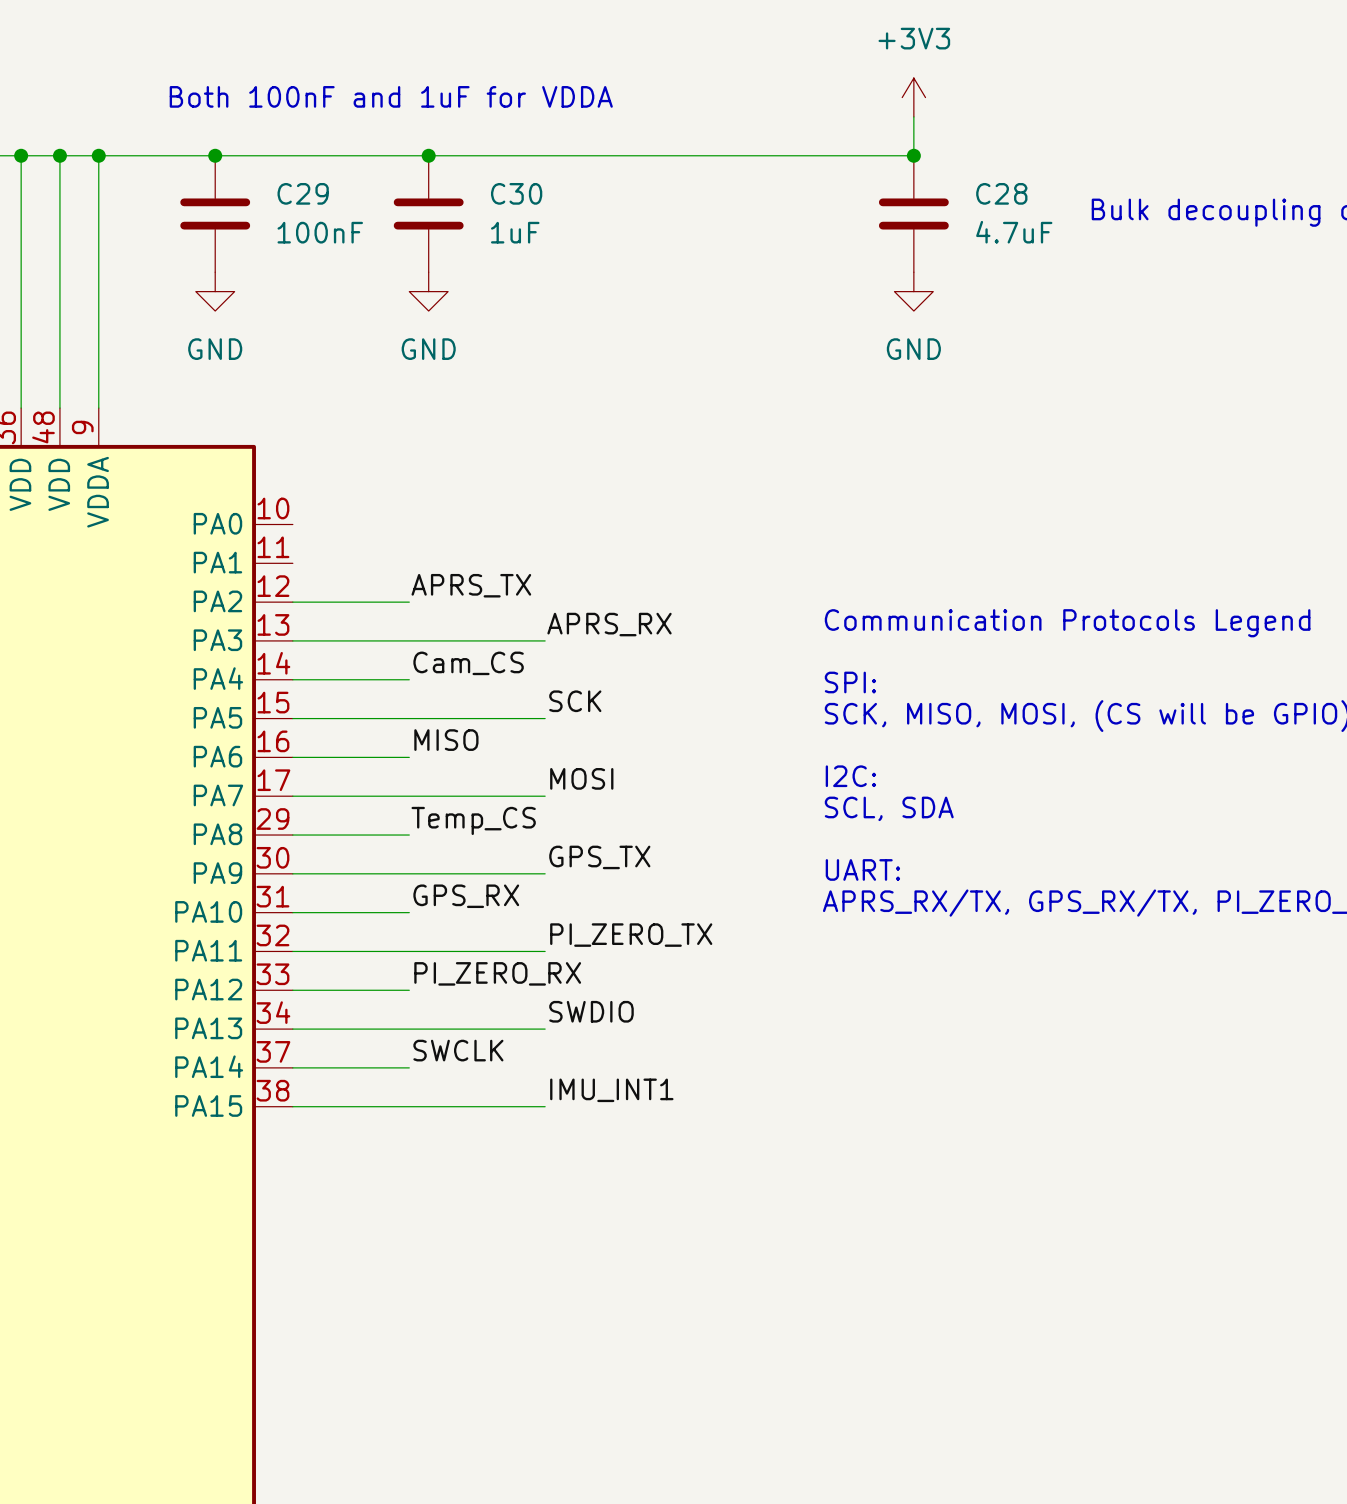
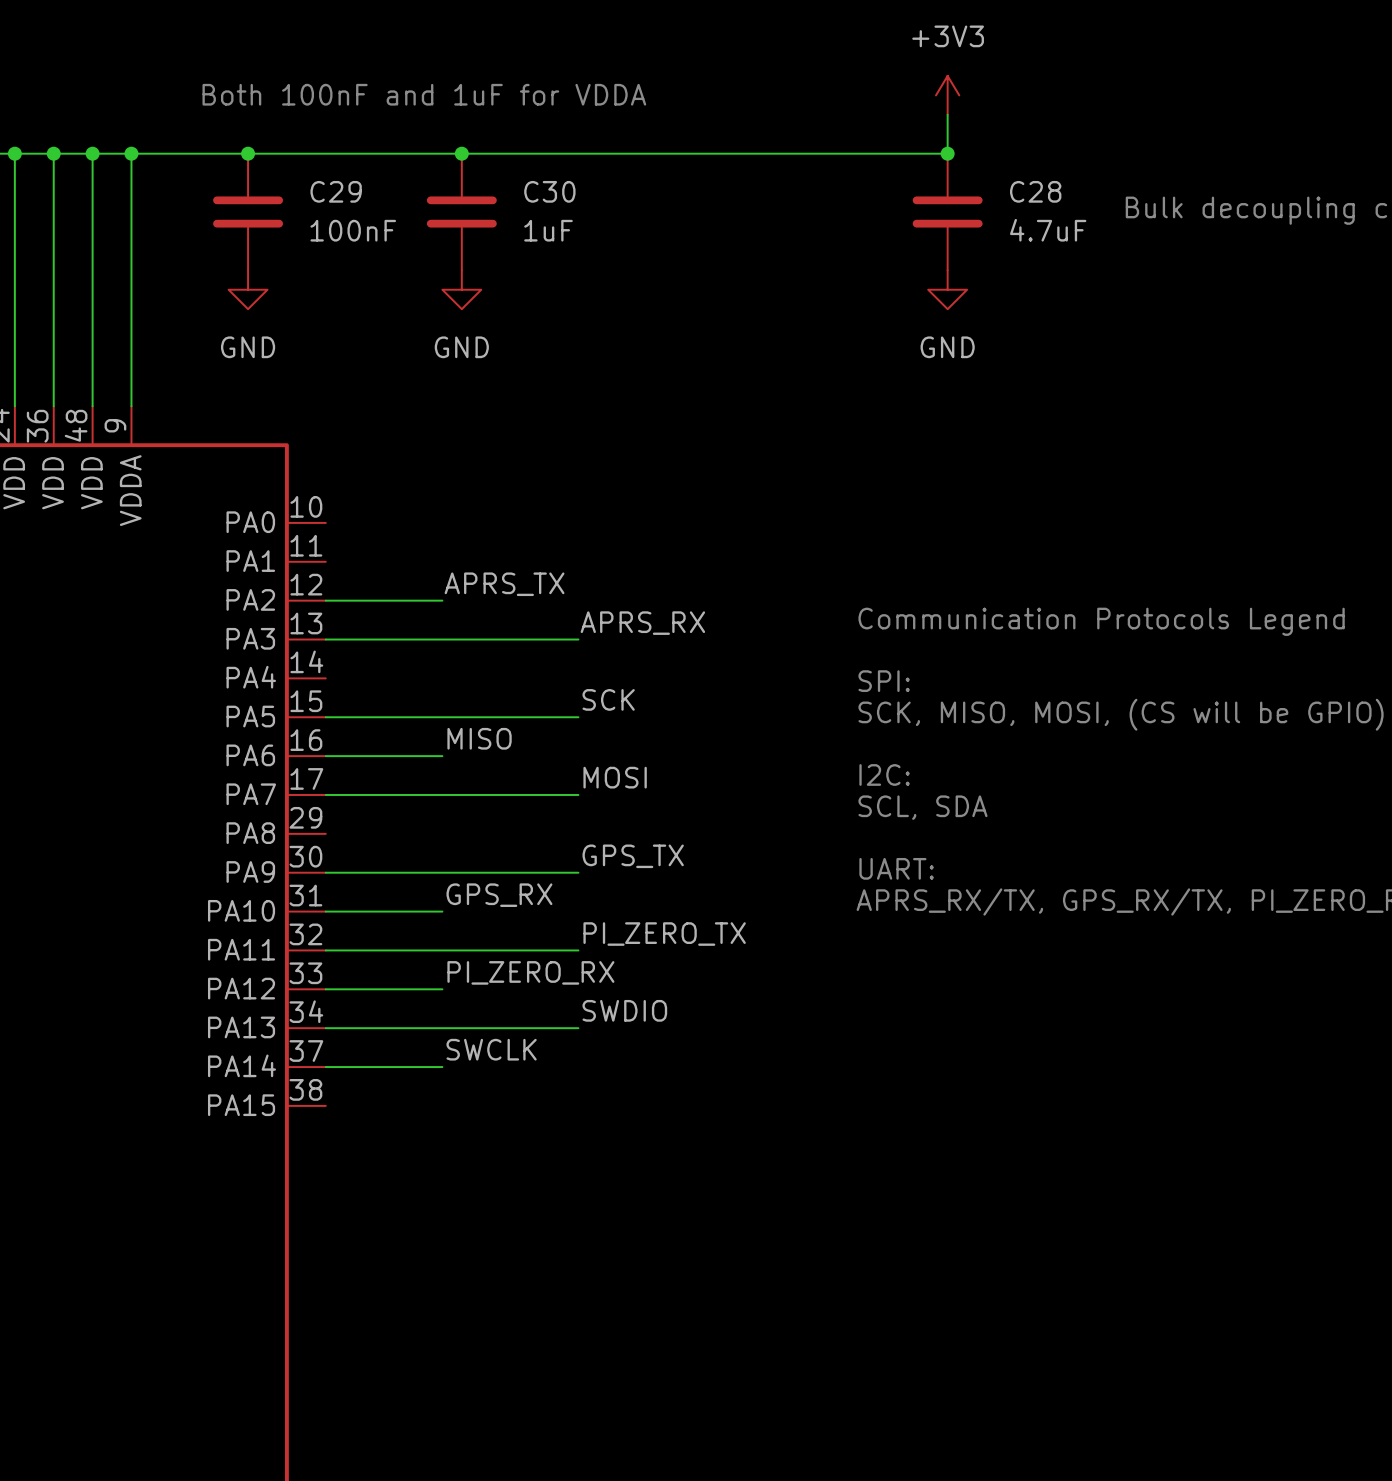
label: Cam_CS (468, 663) -> none
wire: (292, 679) (409, 679) -> none
label: Temp_CS (473, 820) -> none
wire: (292, 835) (409, 835) -> none
label: IMU_INT1 (611, 1090) -> none
wire: (292, 1106) (545, 1106) -> none

